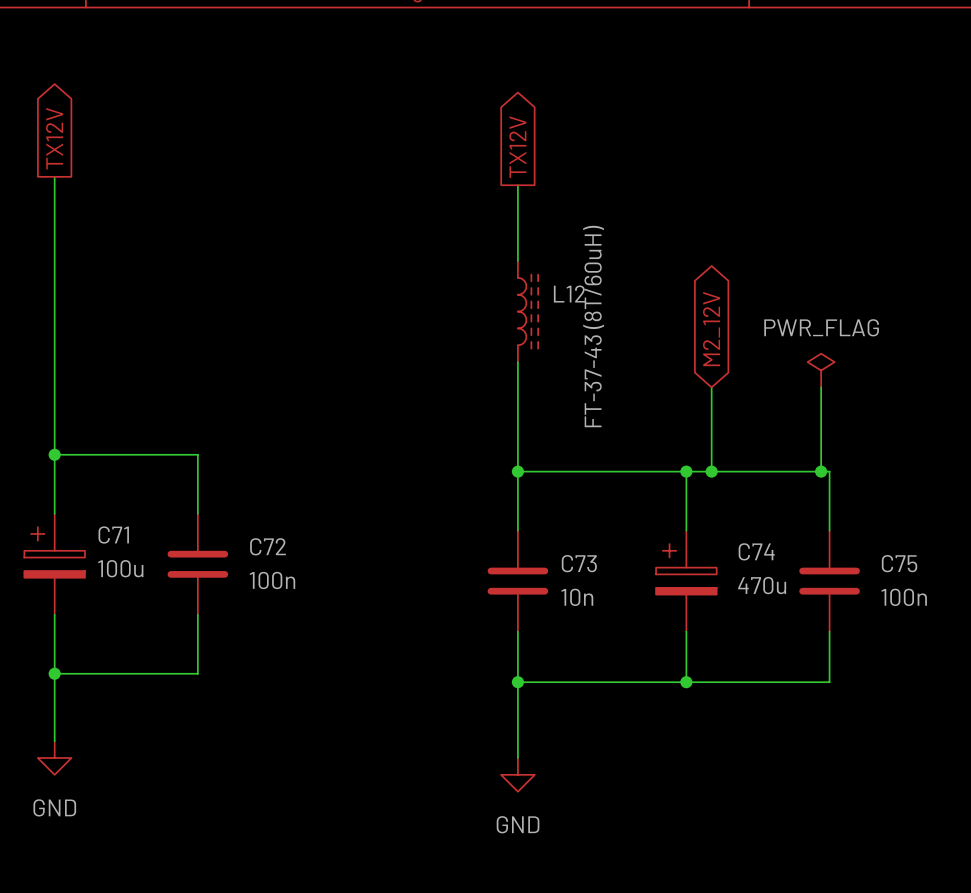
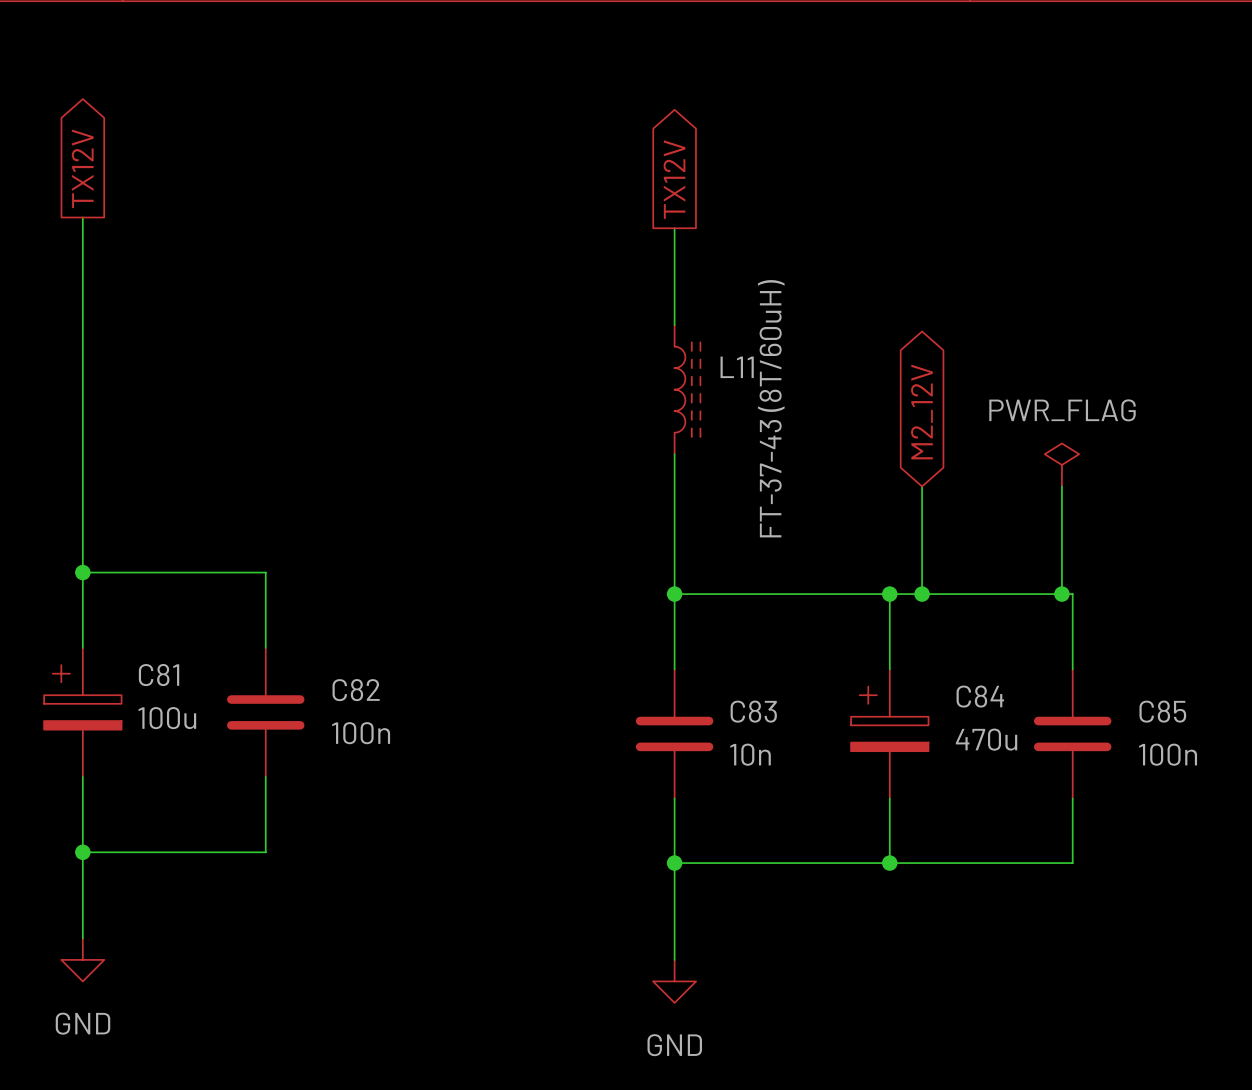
L12 name: L12 (569, 294) -> L11 (737, 367)
C71 name: C71 (113, 535) -> C81 (159, 675)
C72 name: C72 (268, 546) -> C82 (356, 690)
C74 name: C74 (756, 551) -> C84 (980, 696)
C73 name: C73 (579, 563) -> C83 (753, 711)
C75 name: C75 (899, 563) -> C85 (1162, 711)

